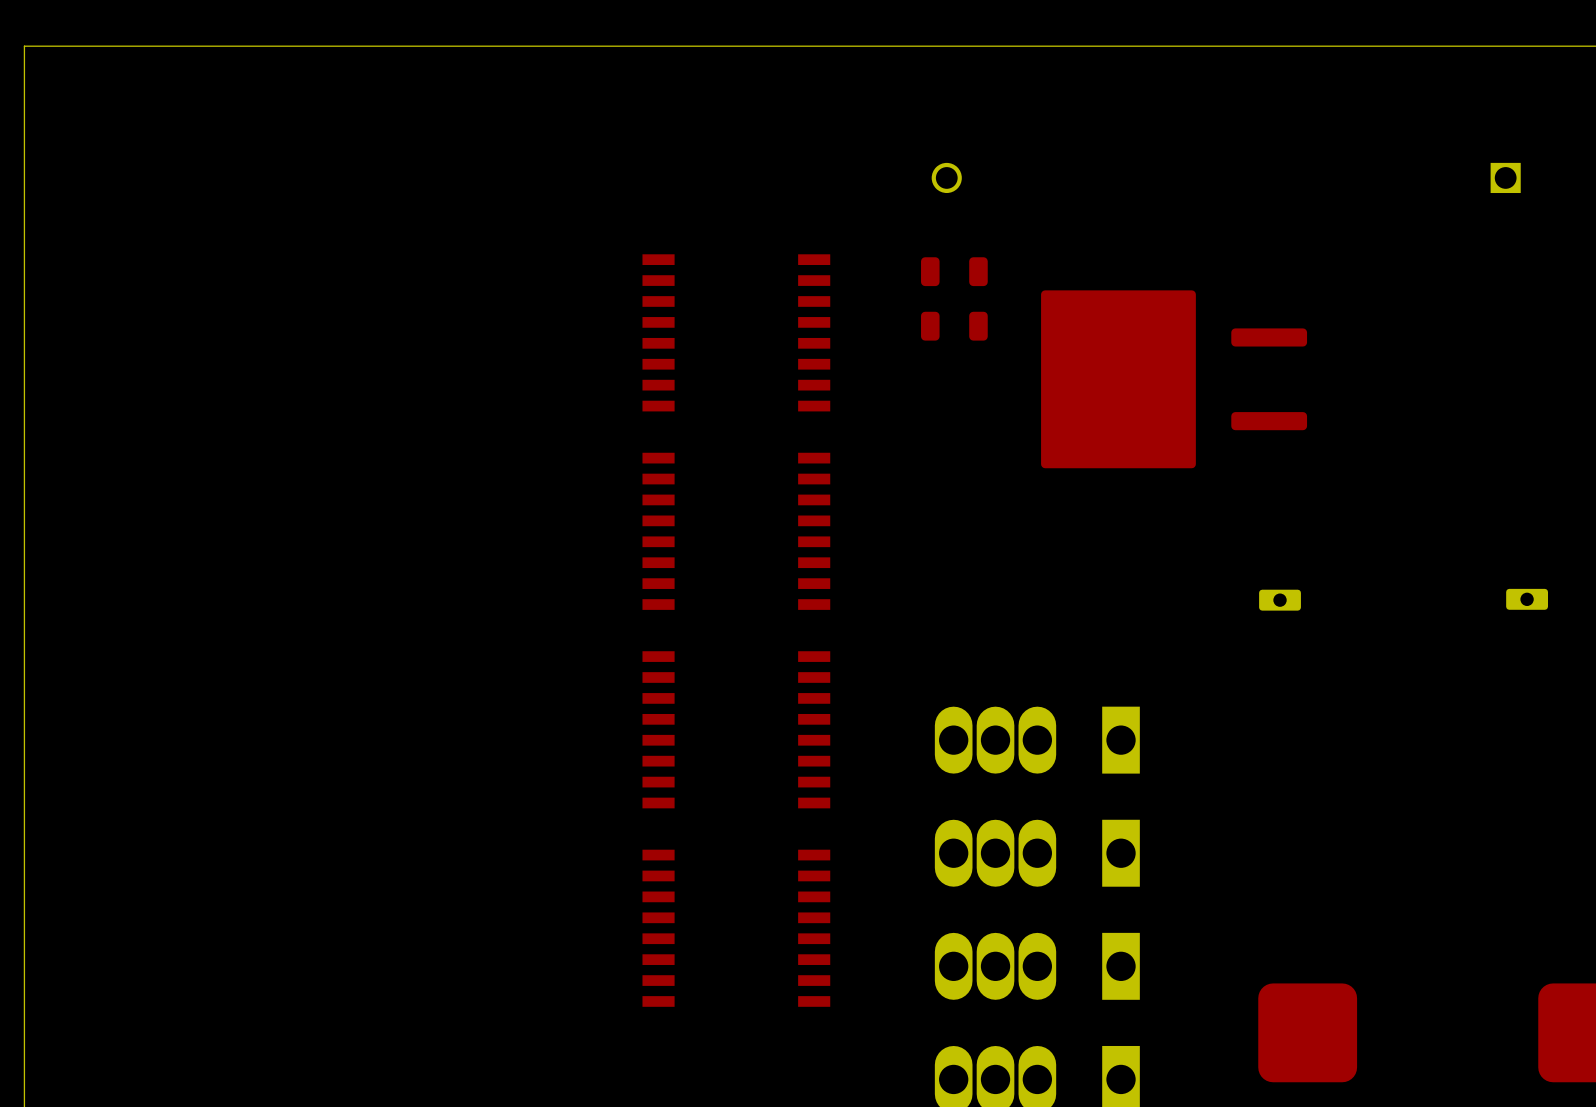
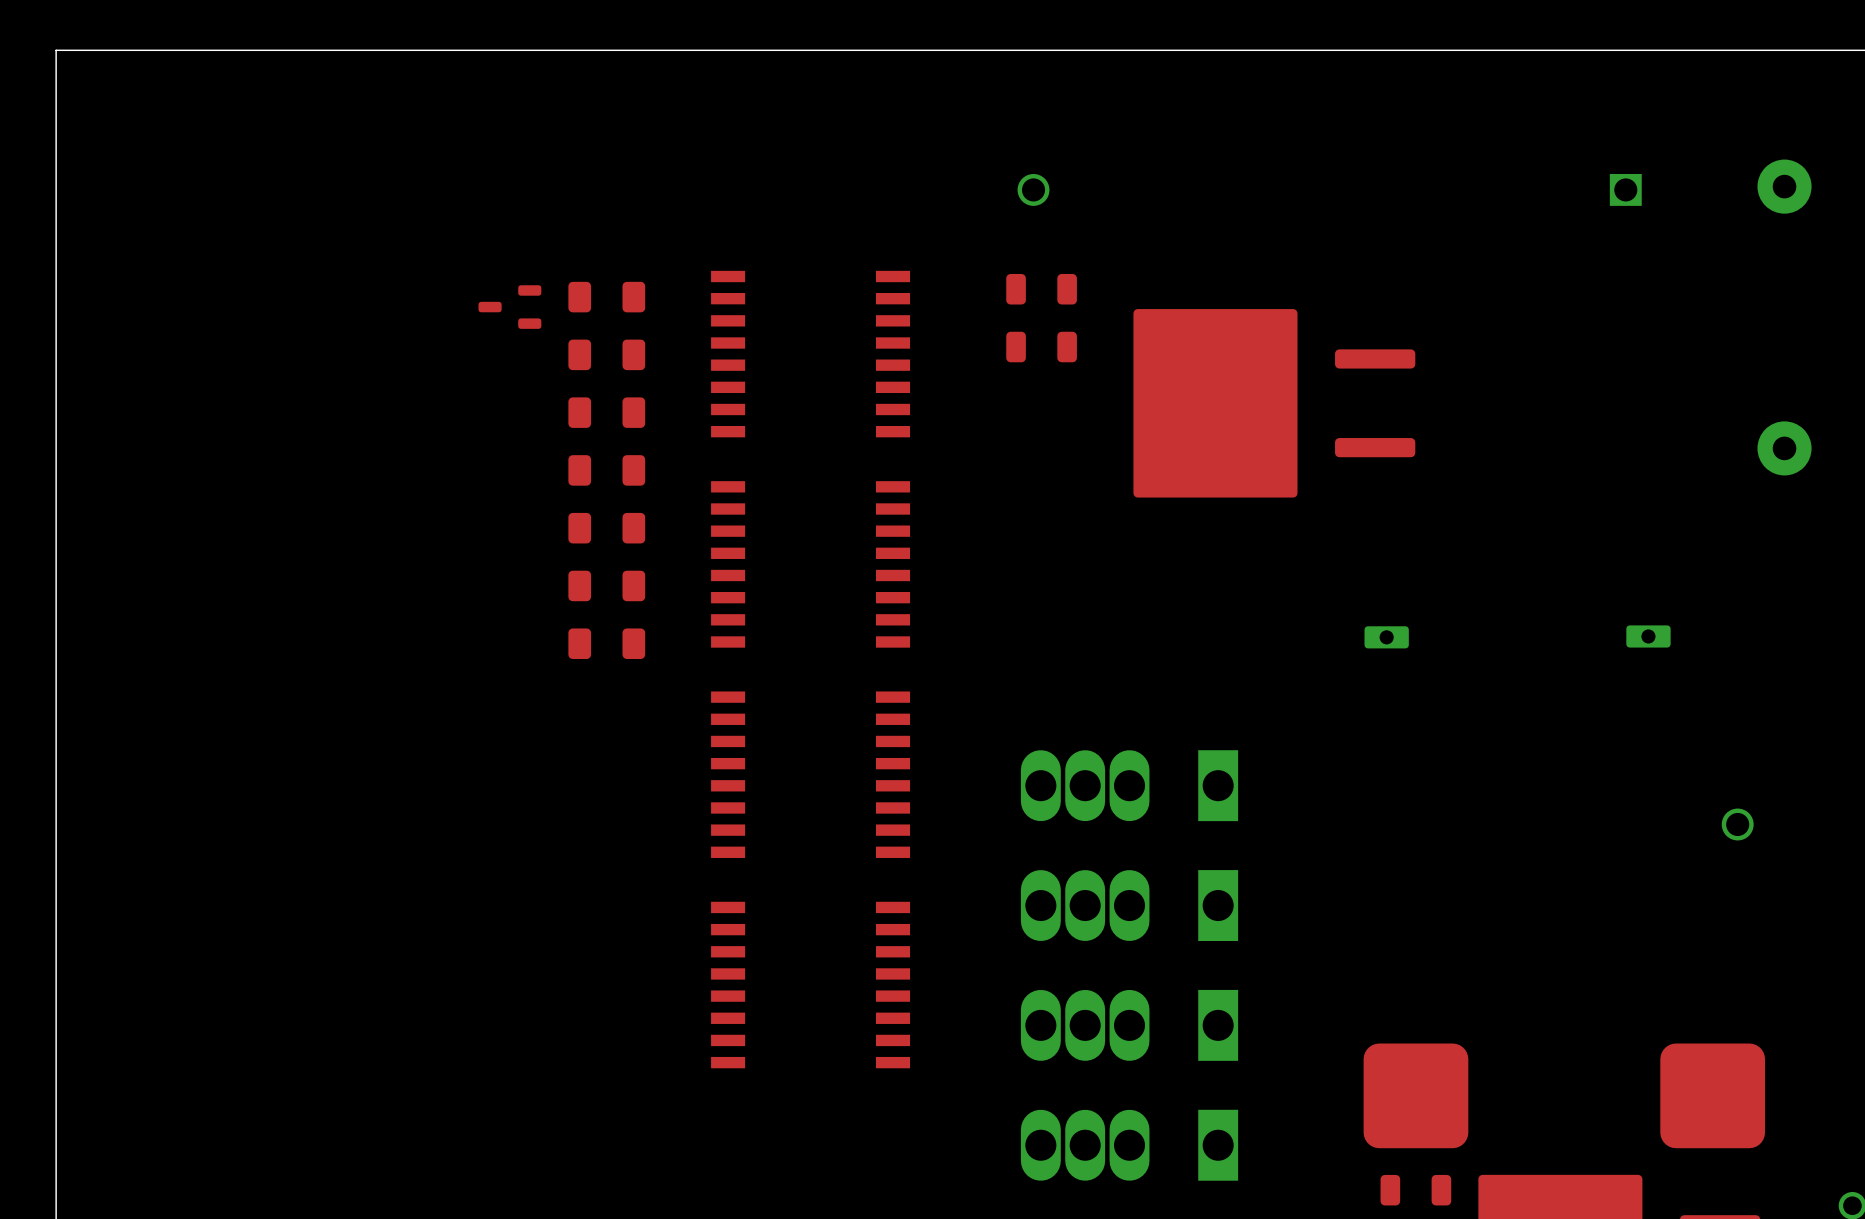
part: none -> (606, 297)
part: none -> (509, 307)
part: none -> (606, 354)
part: none -> (606, 412)
part: none -> (606, 470)
part: none -> (606, 528)
part: none -> (606, 585)
part: none -> (606, 643)

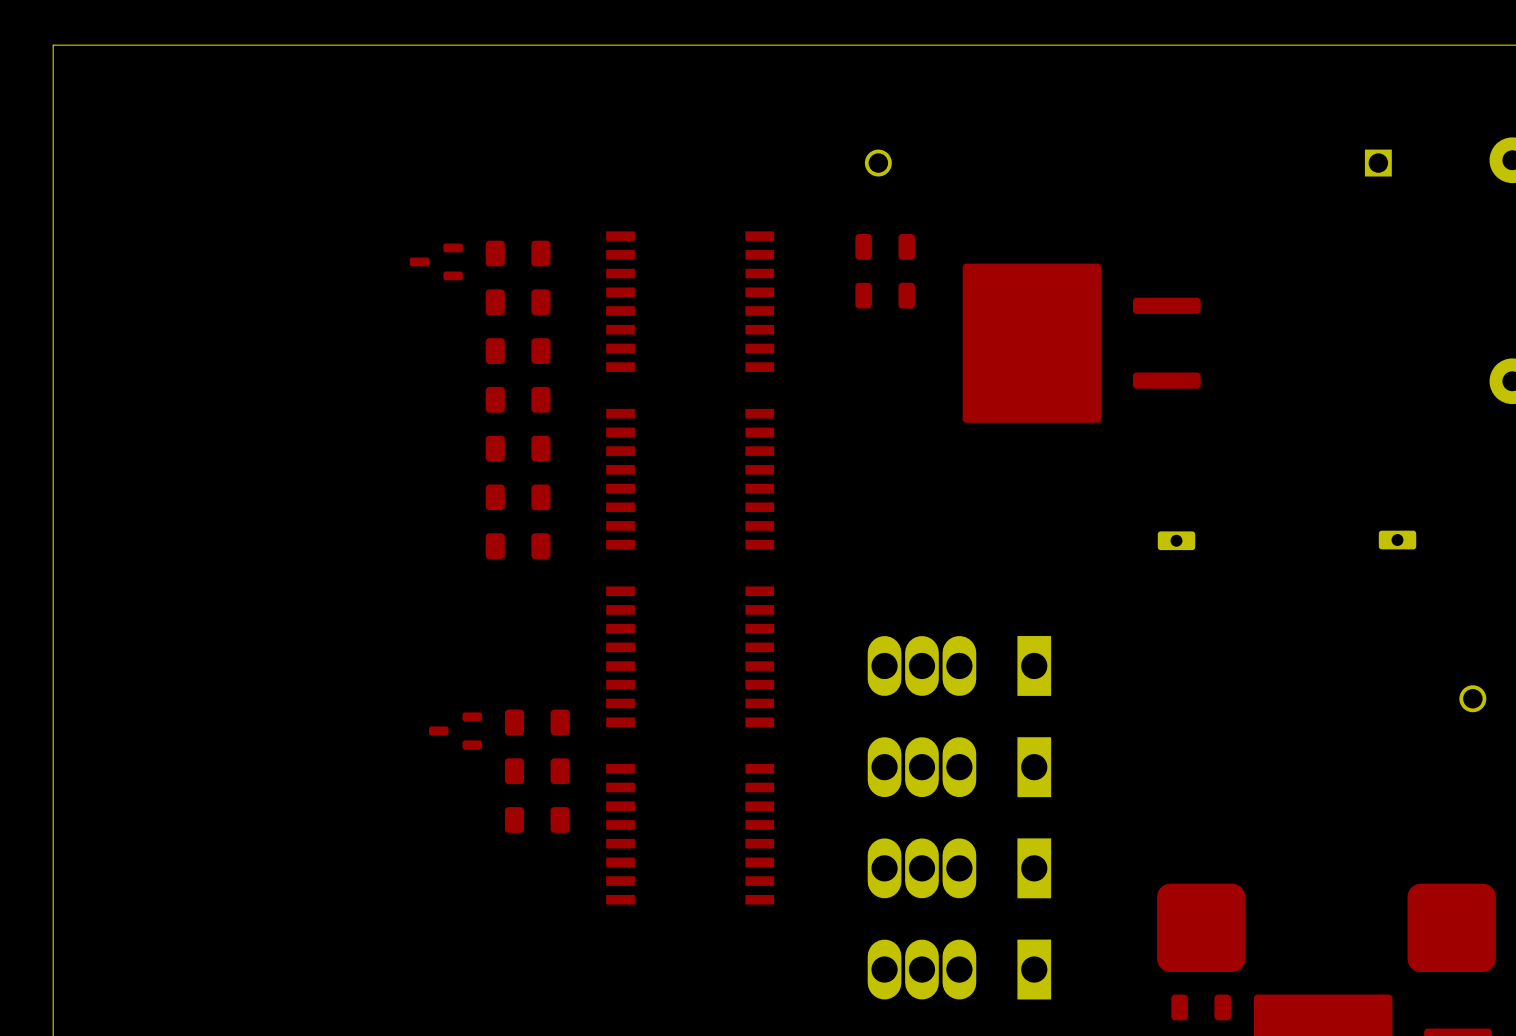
part: none -> (537, 722)
part: none -> (455, 730)
part: none -> (537, 771)
part: none -> (537, 819)

